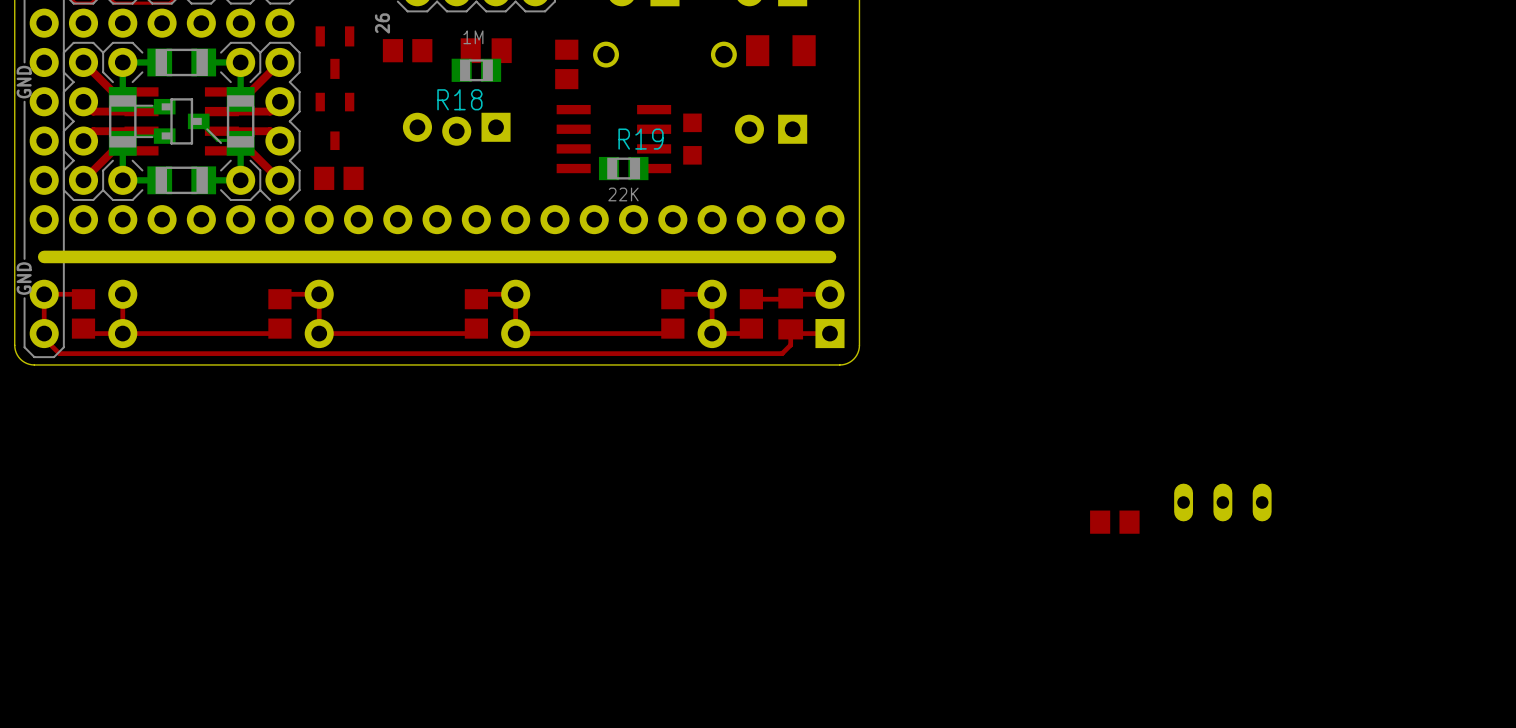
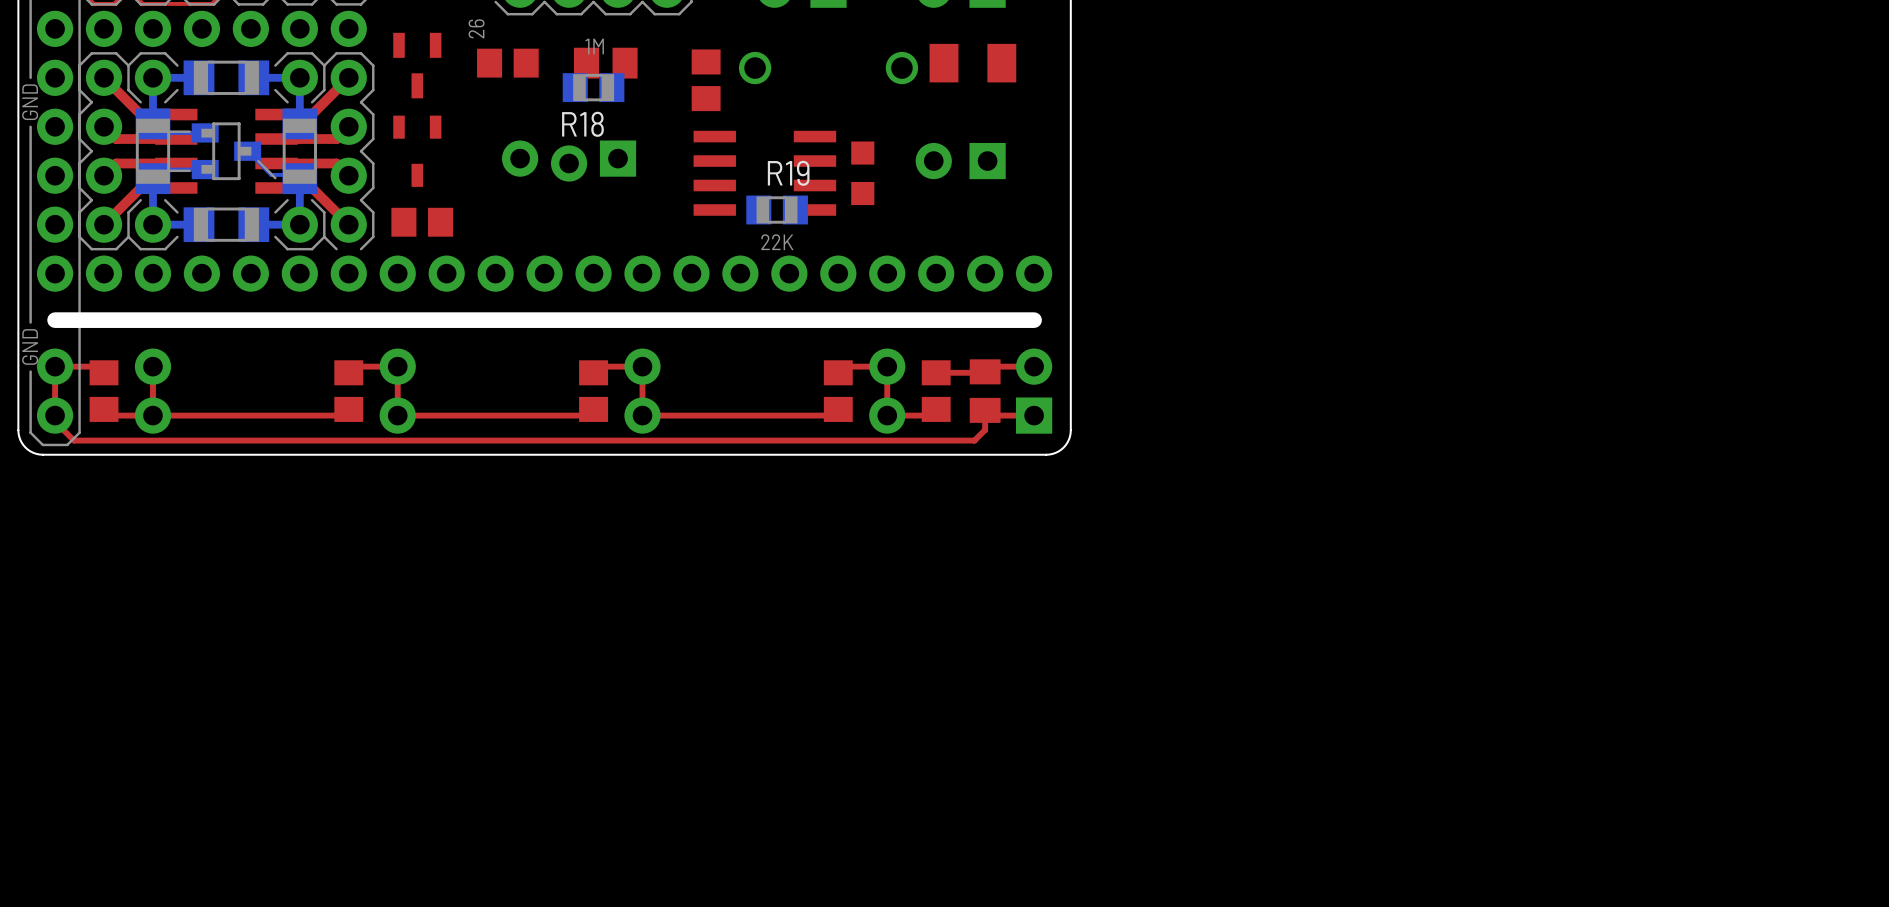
part: (1222, 502) -> none
part: (1114, 522) -> none

